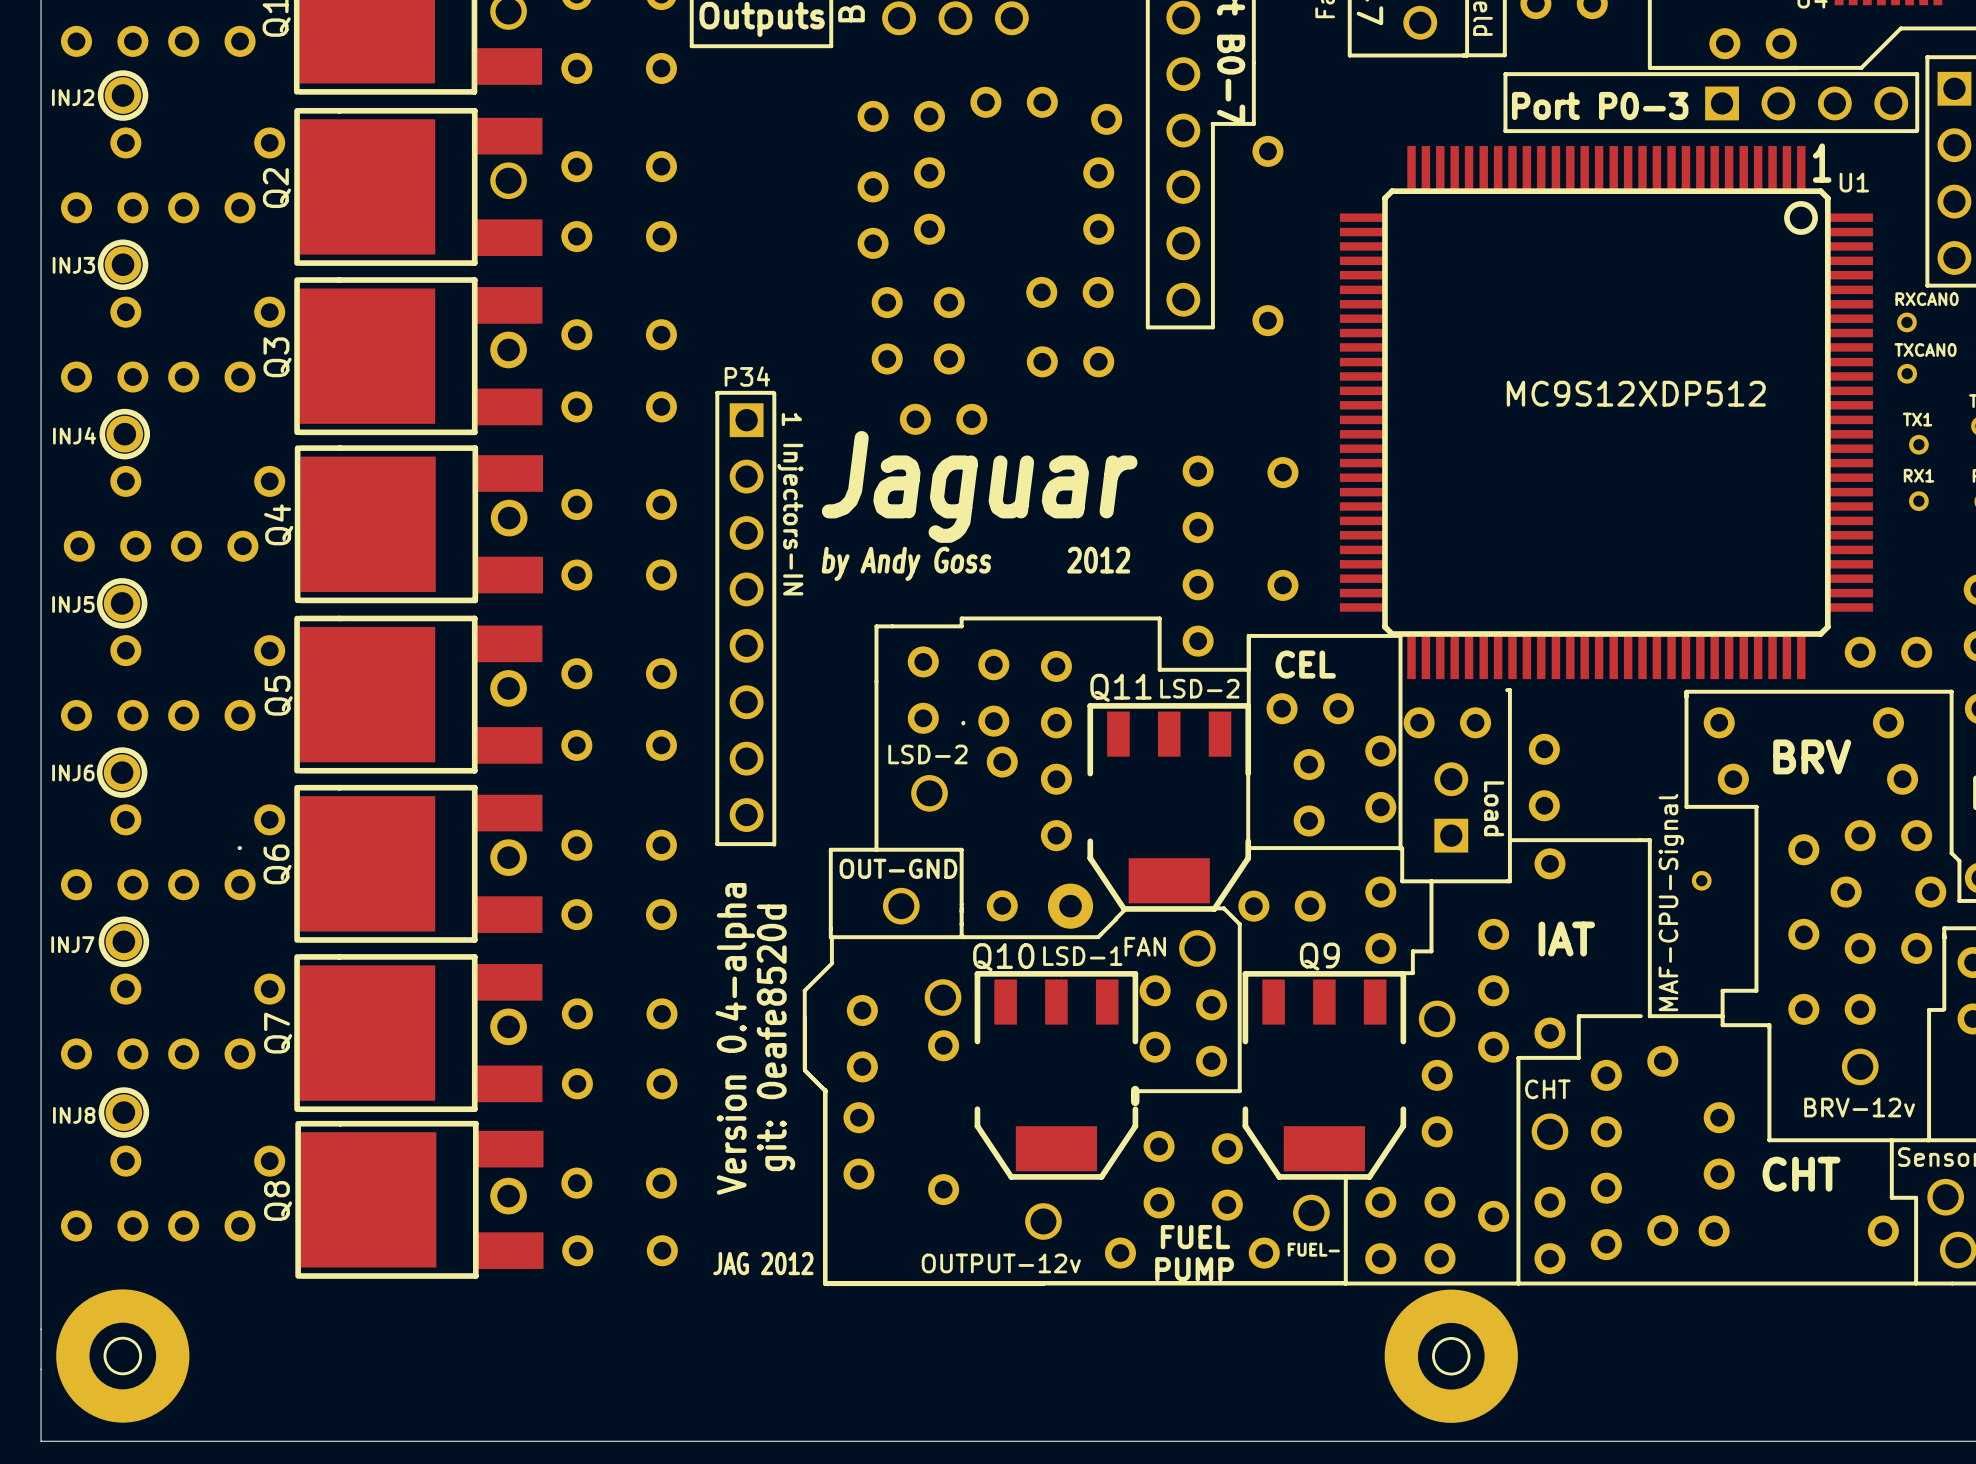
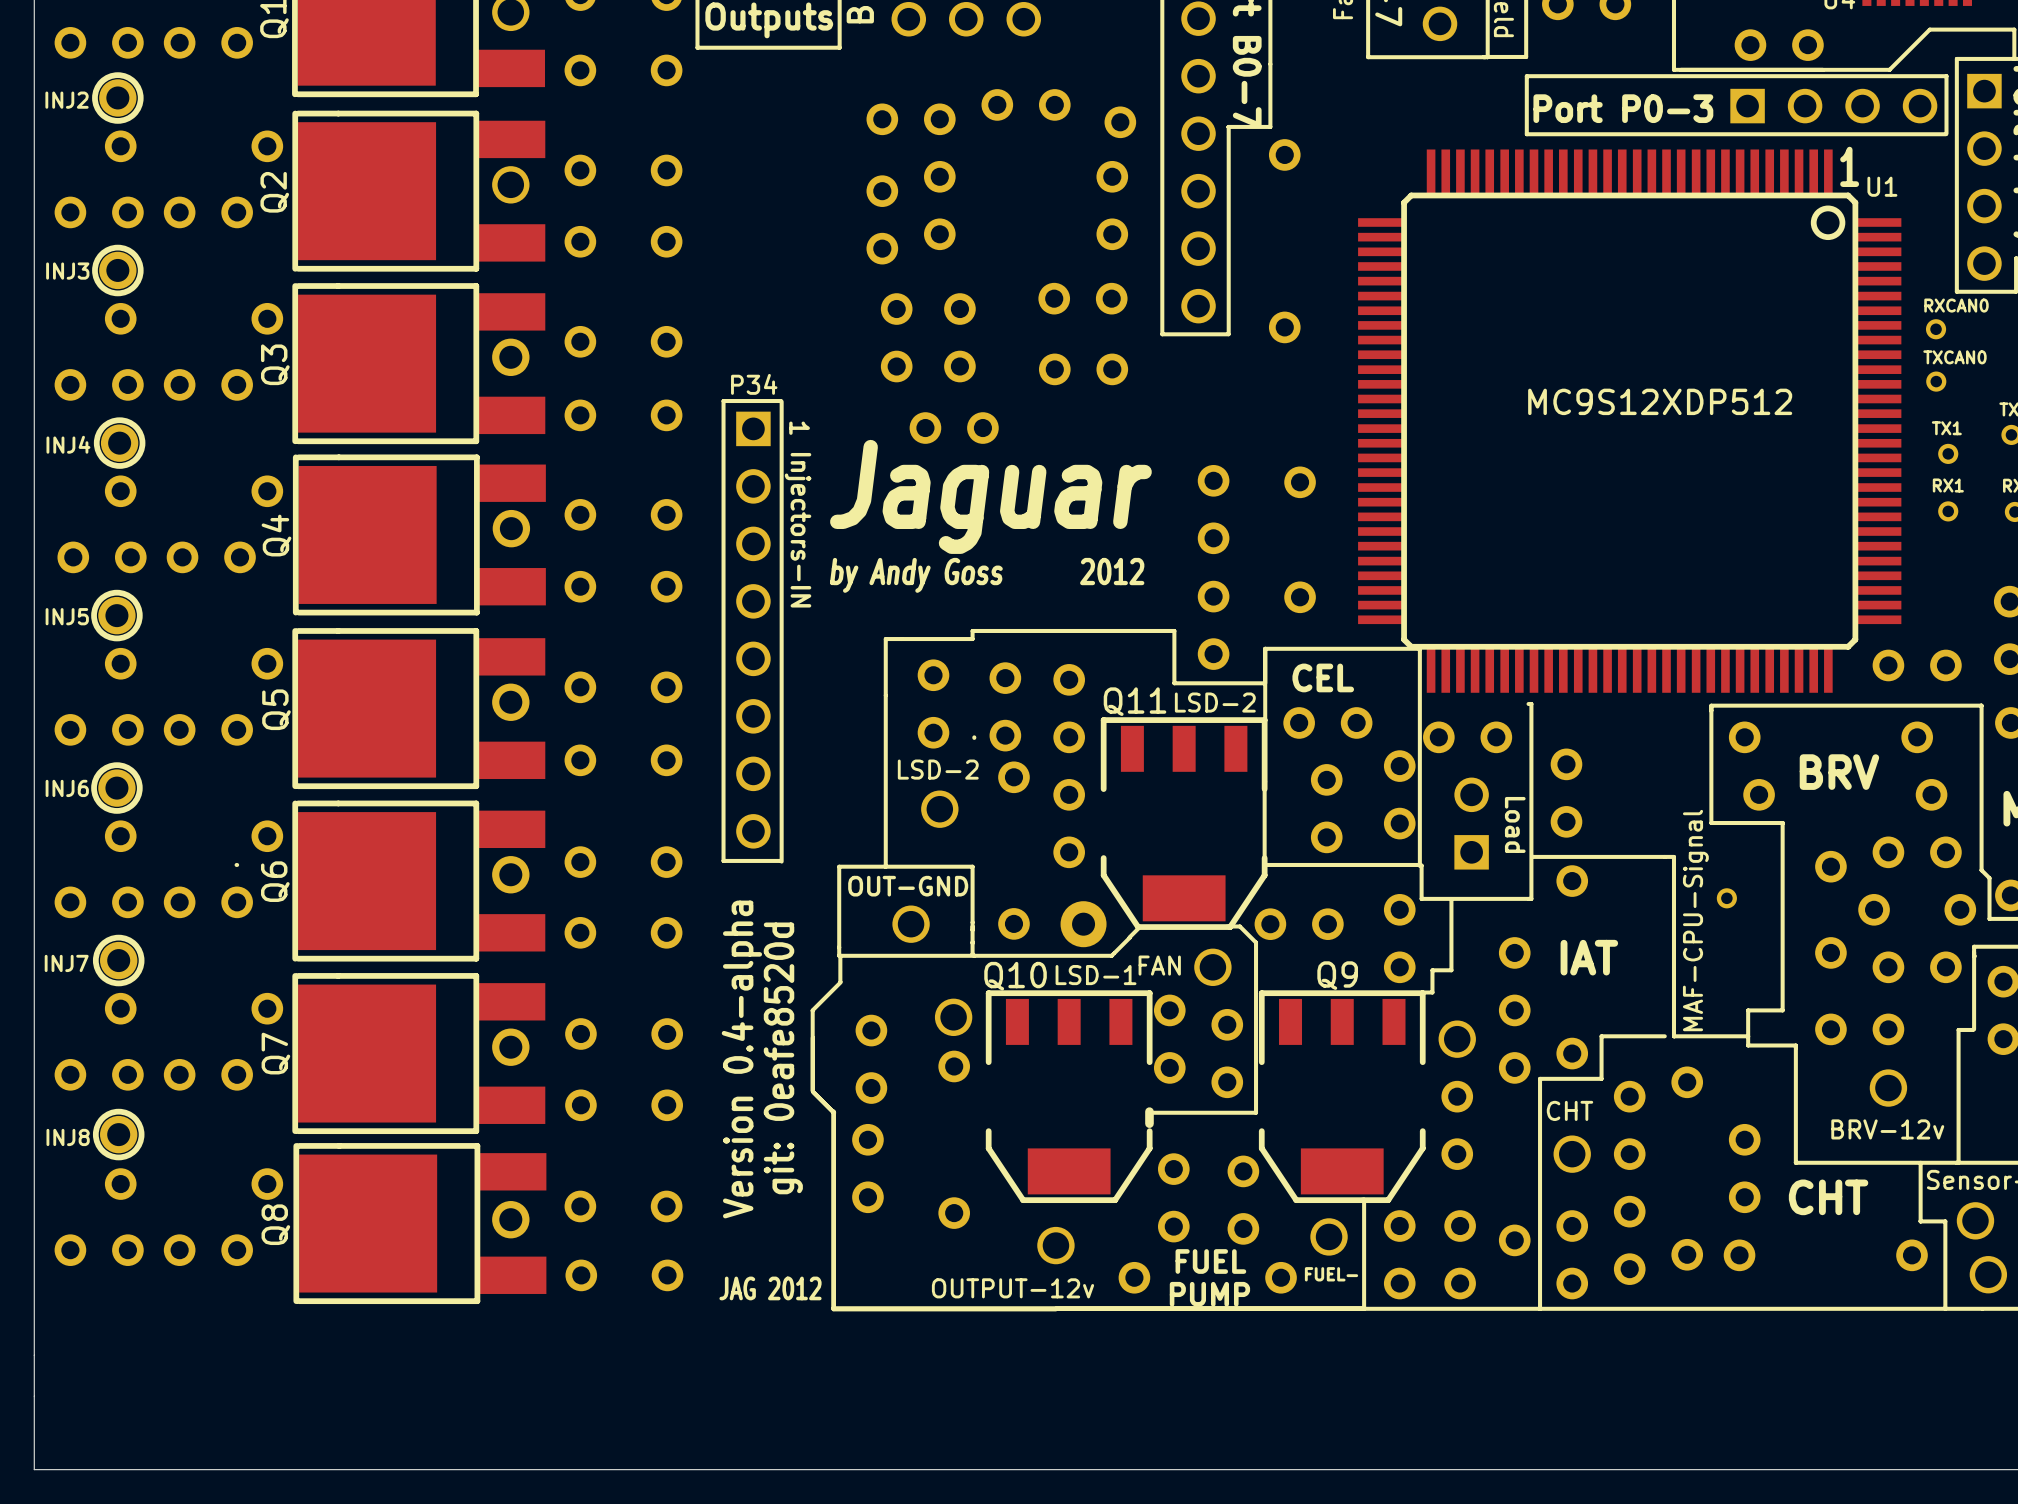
part: (122, 1356) -> none
part: (1451, 1356) -> none

